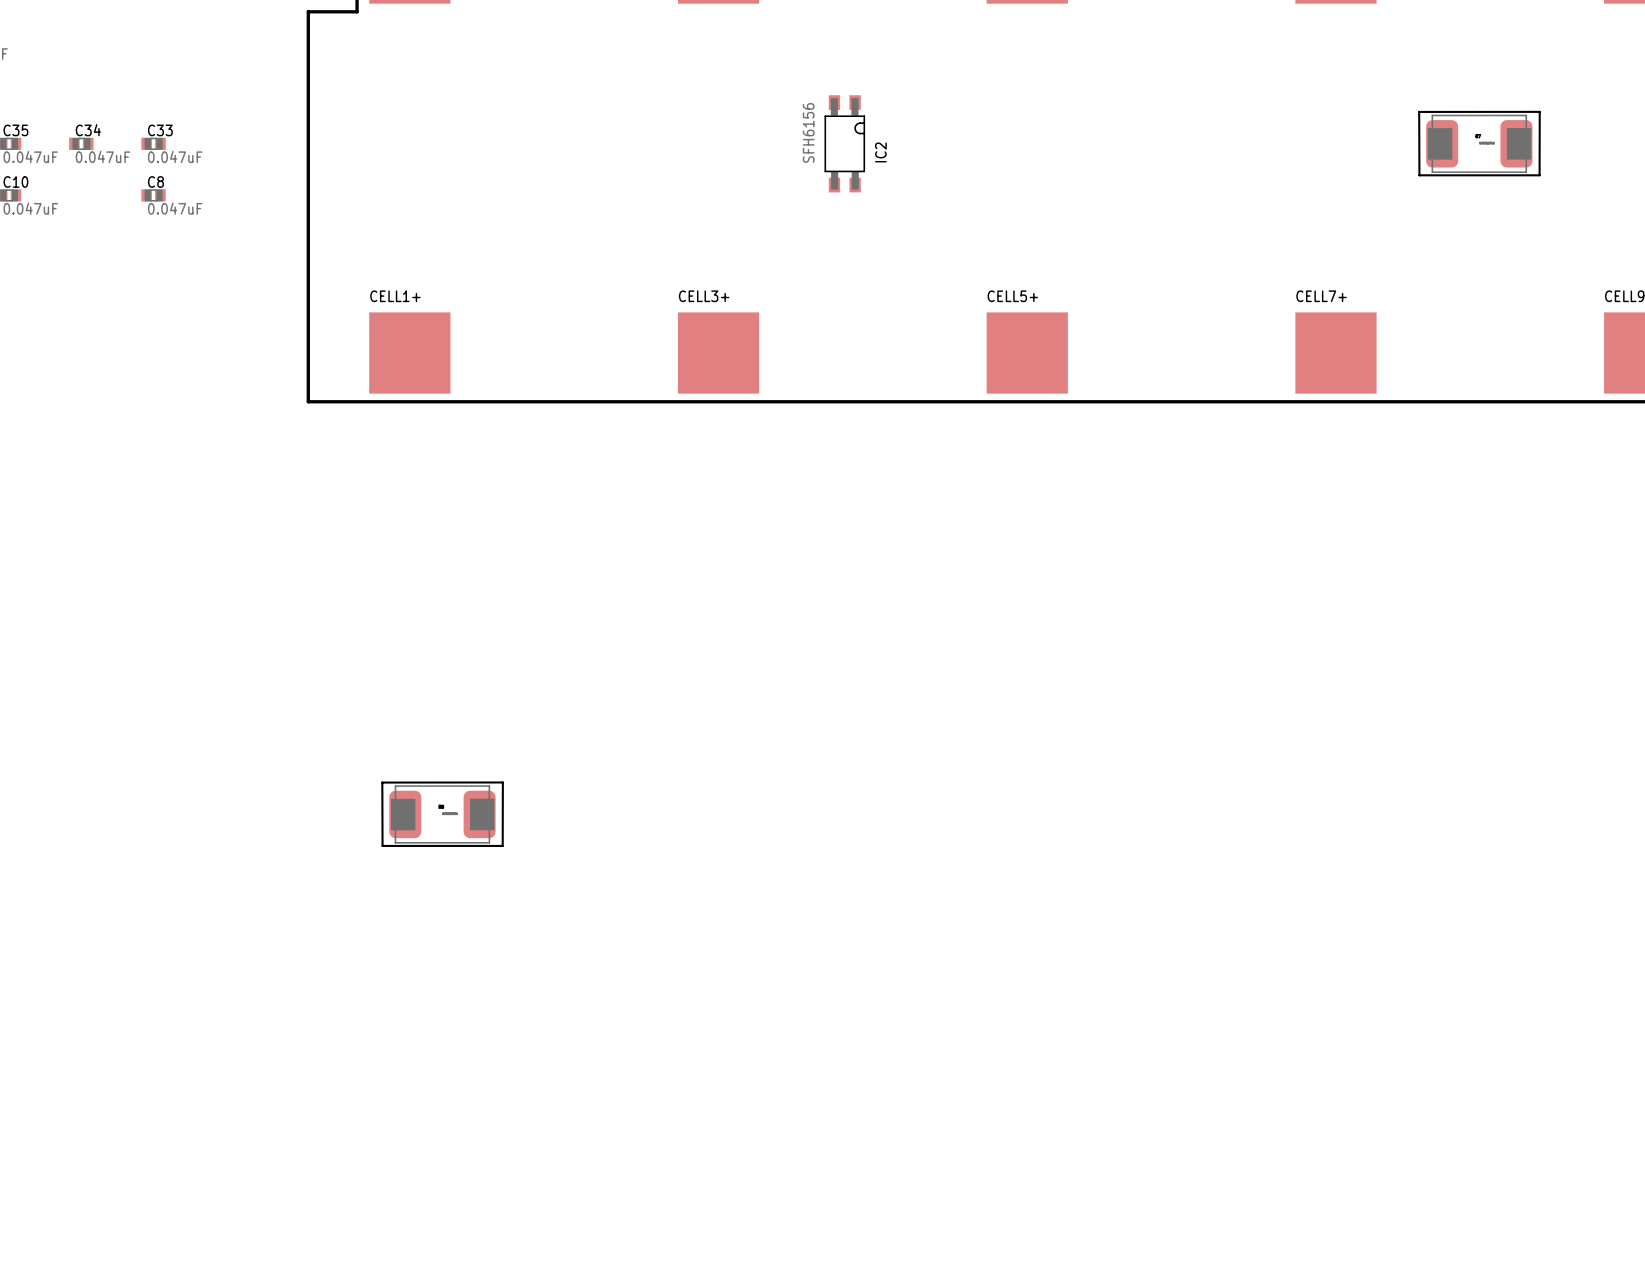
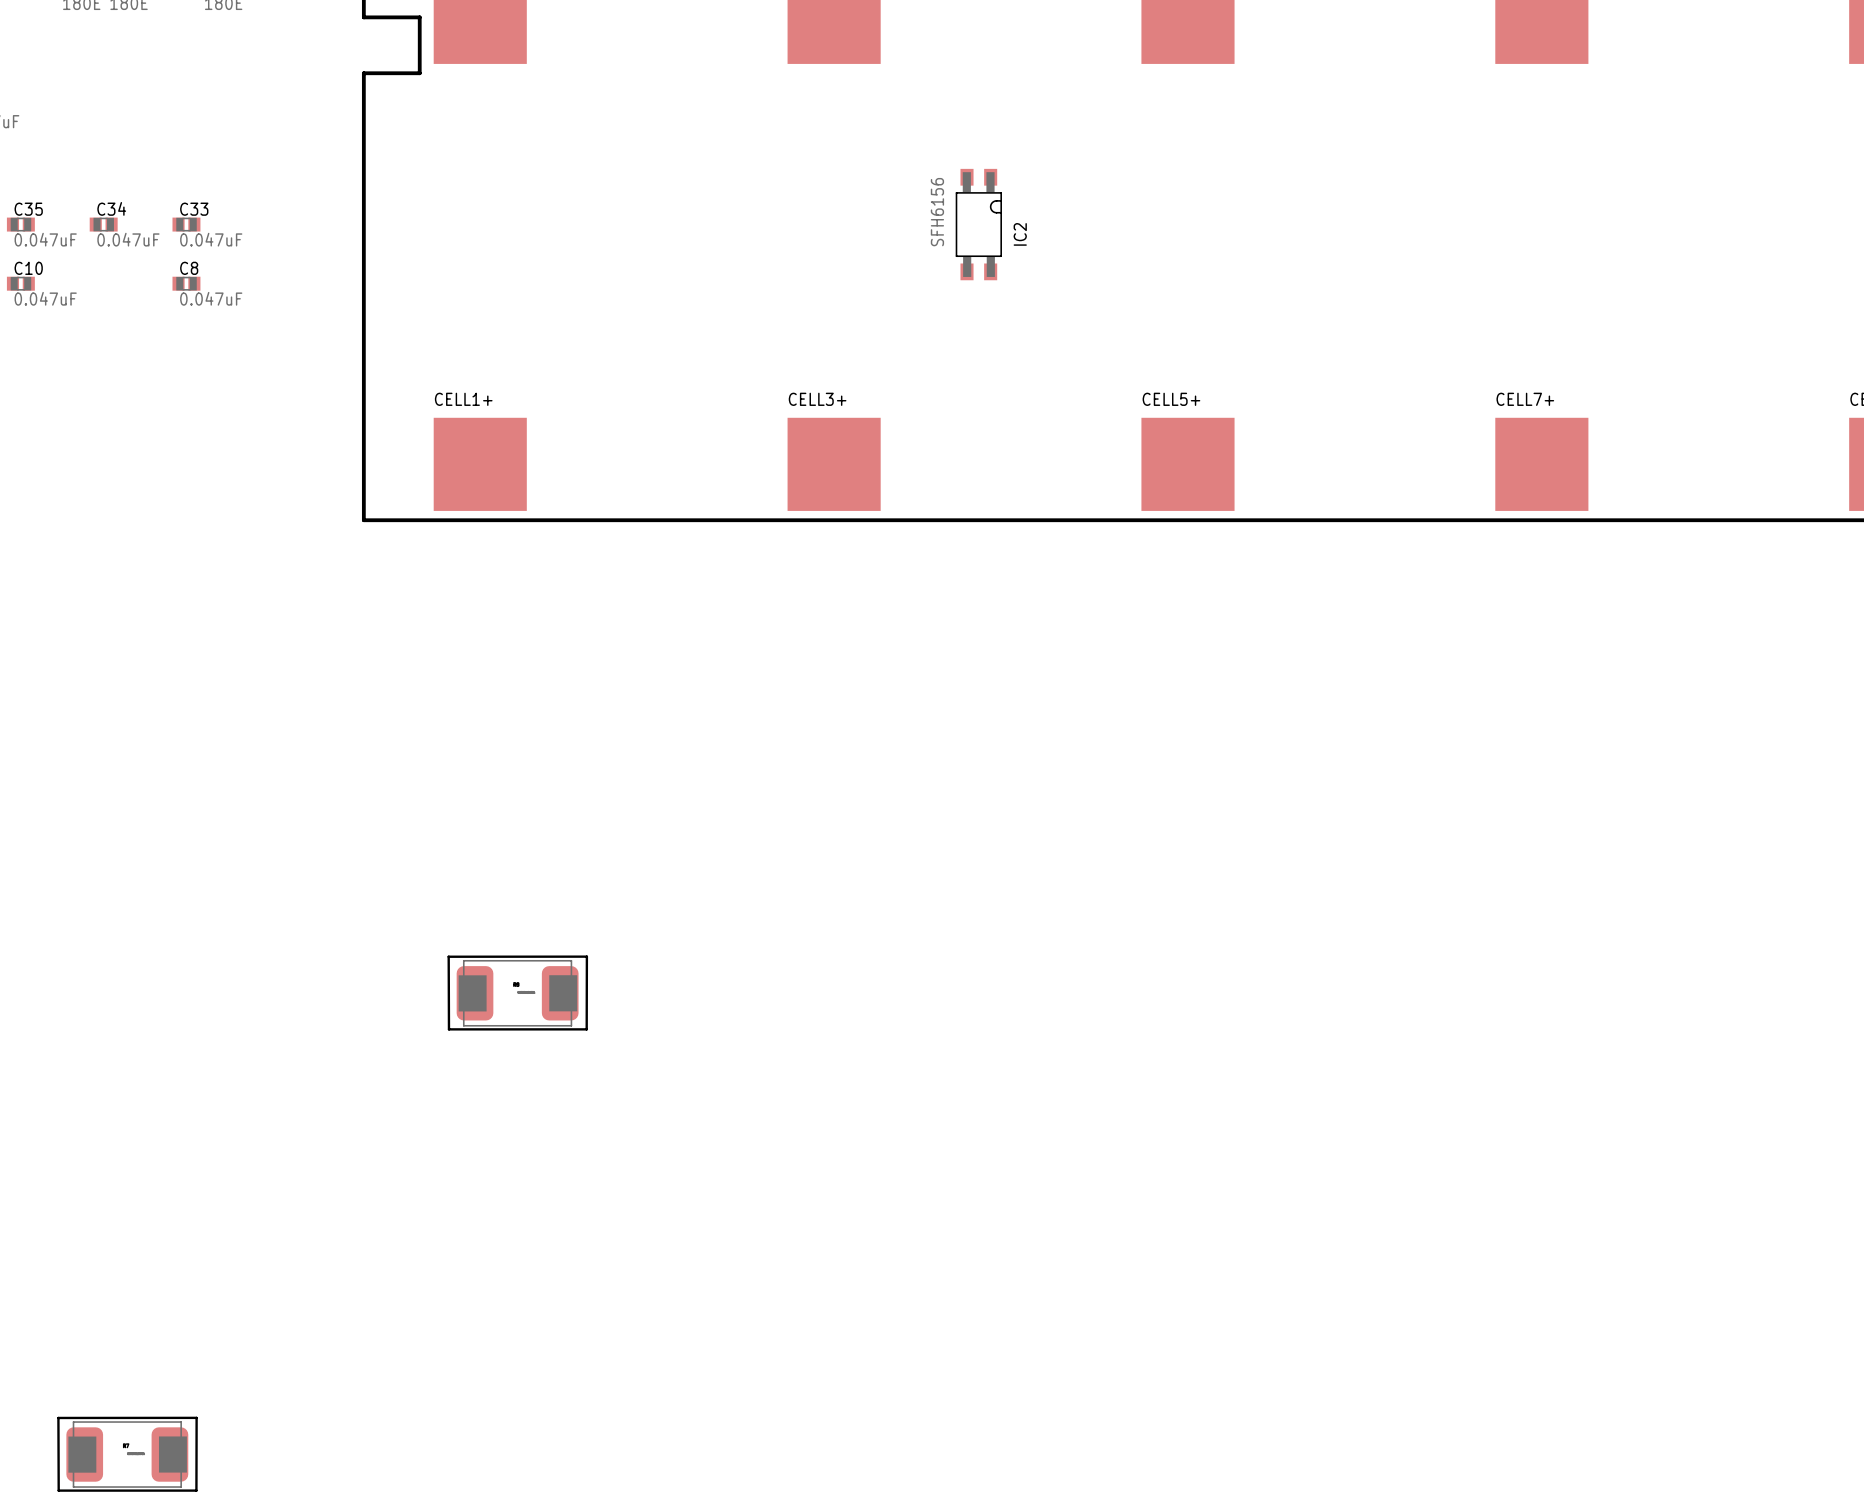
part position: (1479, 143) -> (127, 1454)

